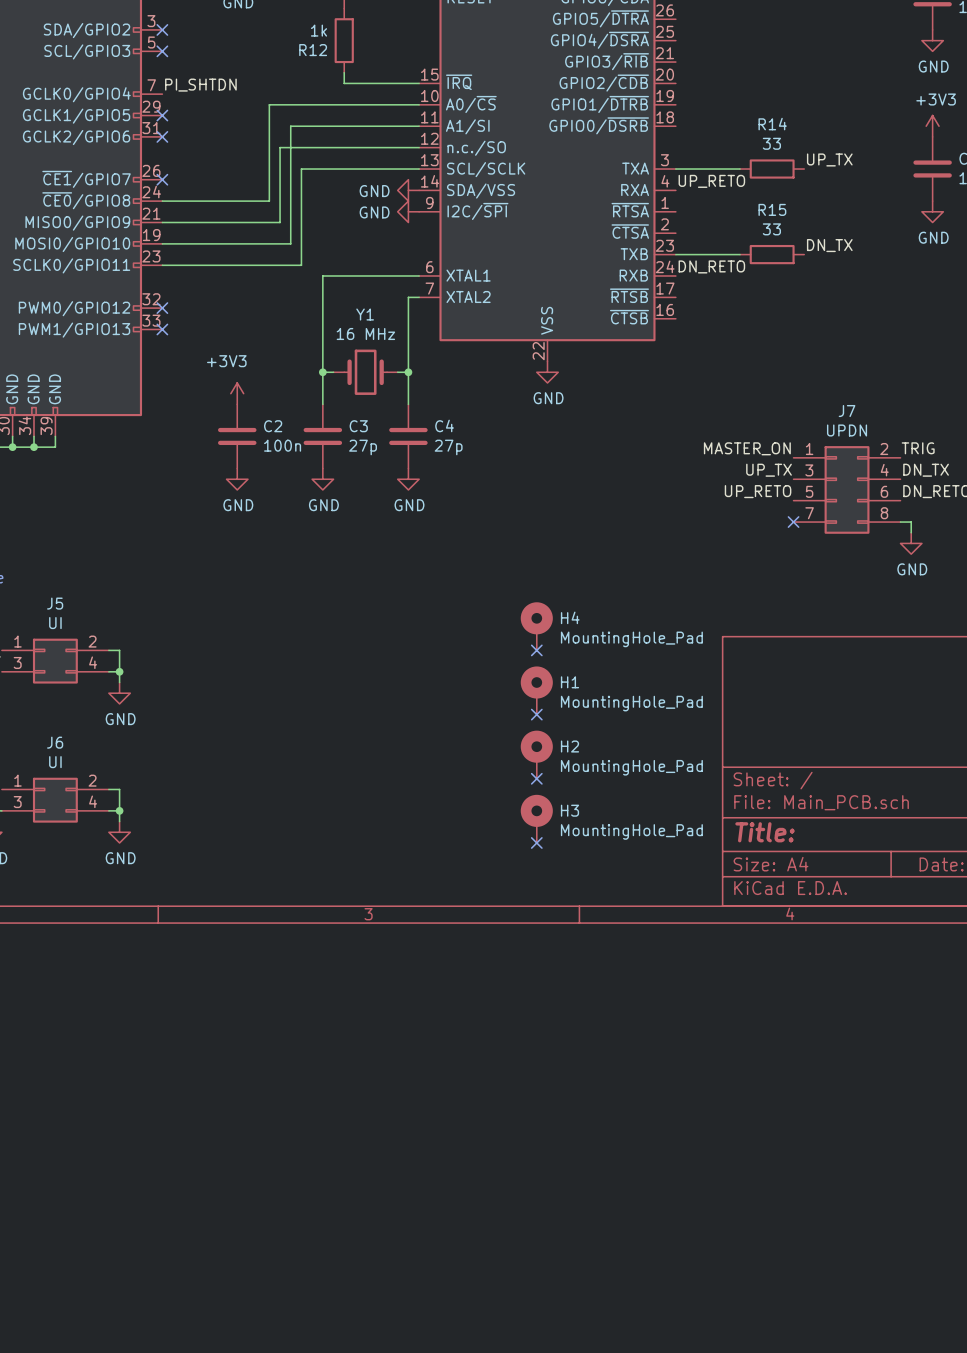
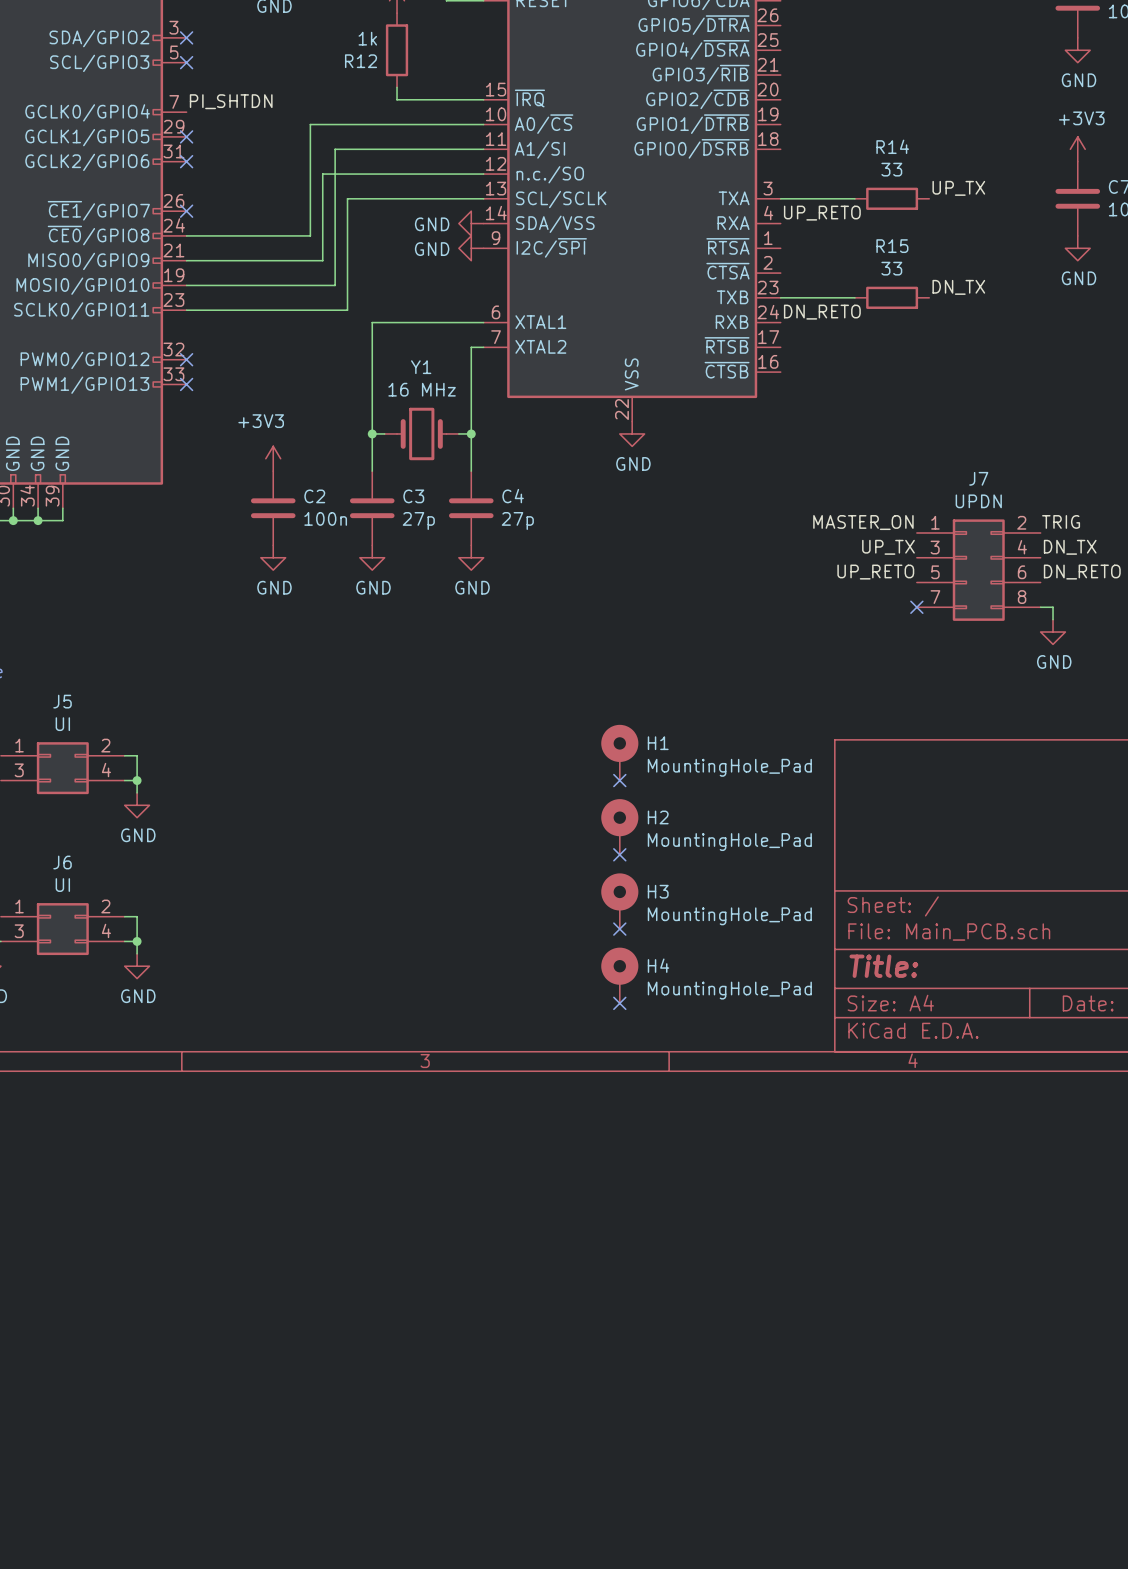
H4 position: (536, 626) -> (619, 975)
no-connect mark: (536, 650) -> none
no-connect mark: none -> (619, 780)
H1 position: (536, 690) -> (619, 752)
no-connect mark: (536, 714) -> none
no-connect mark: none -> (619, 854)
H2 position: (536, 754) -> (619, 826)
no-connect mark: (536, 778) -> none
no-connect mark: none -> (619, 929)
H3 position: (536, 818) -> (619, 901)
no-connect mark: (536, 842) -> none
no-connect mark: none -> (619, 1003)

